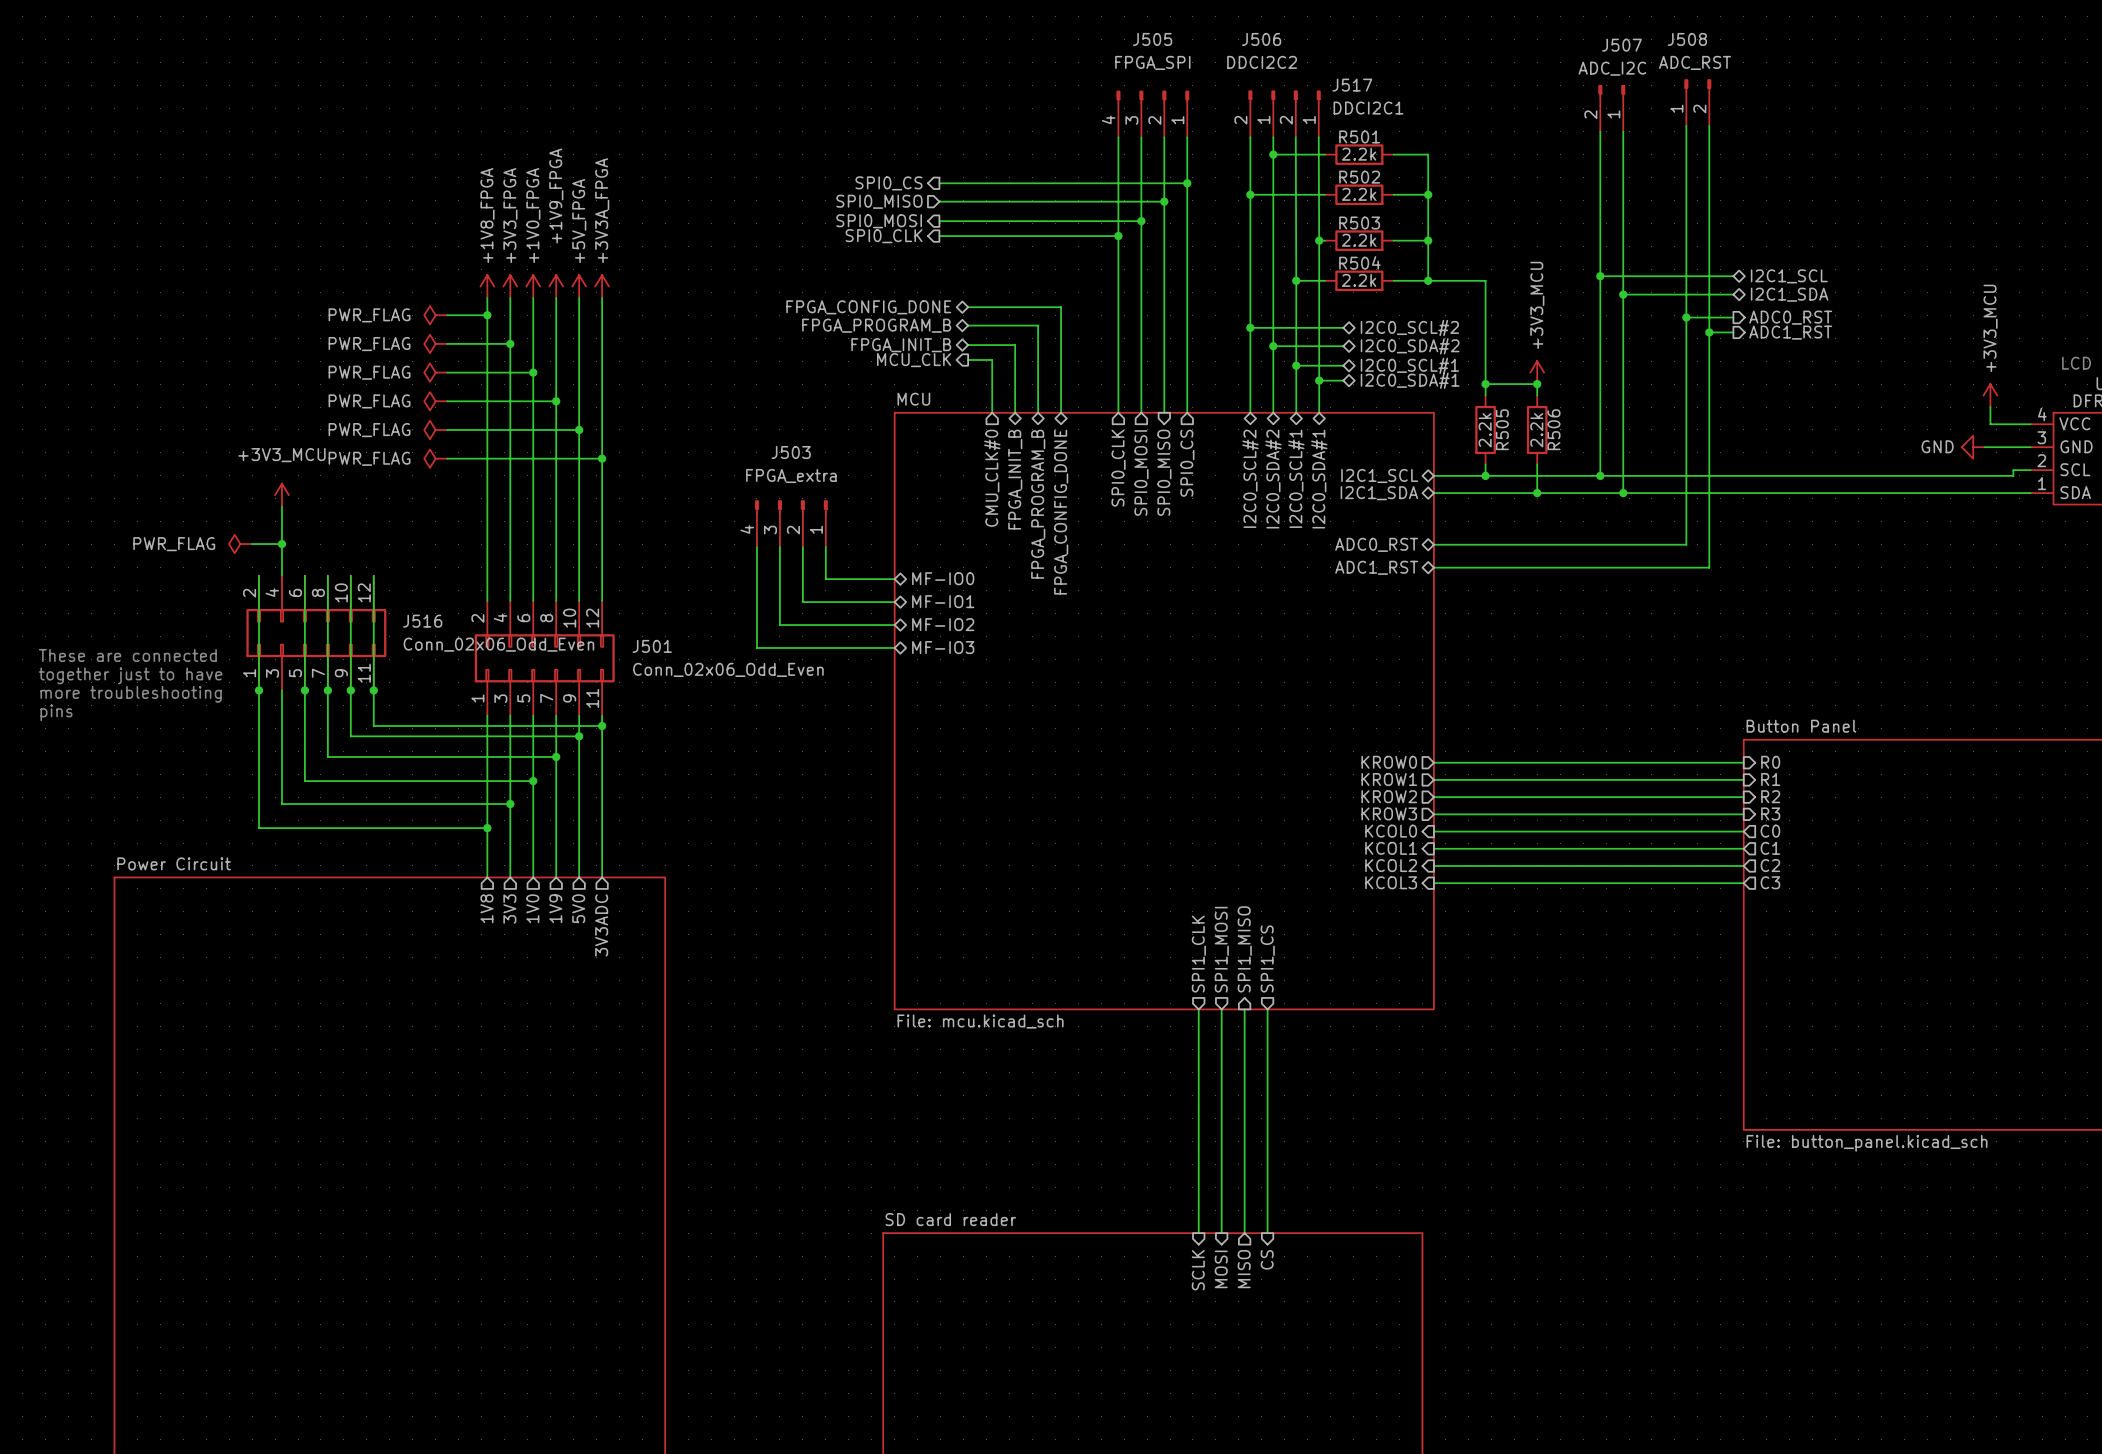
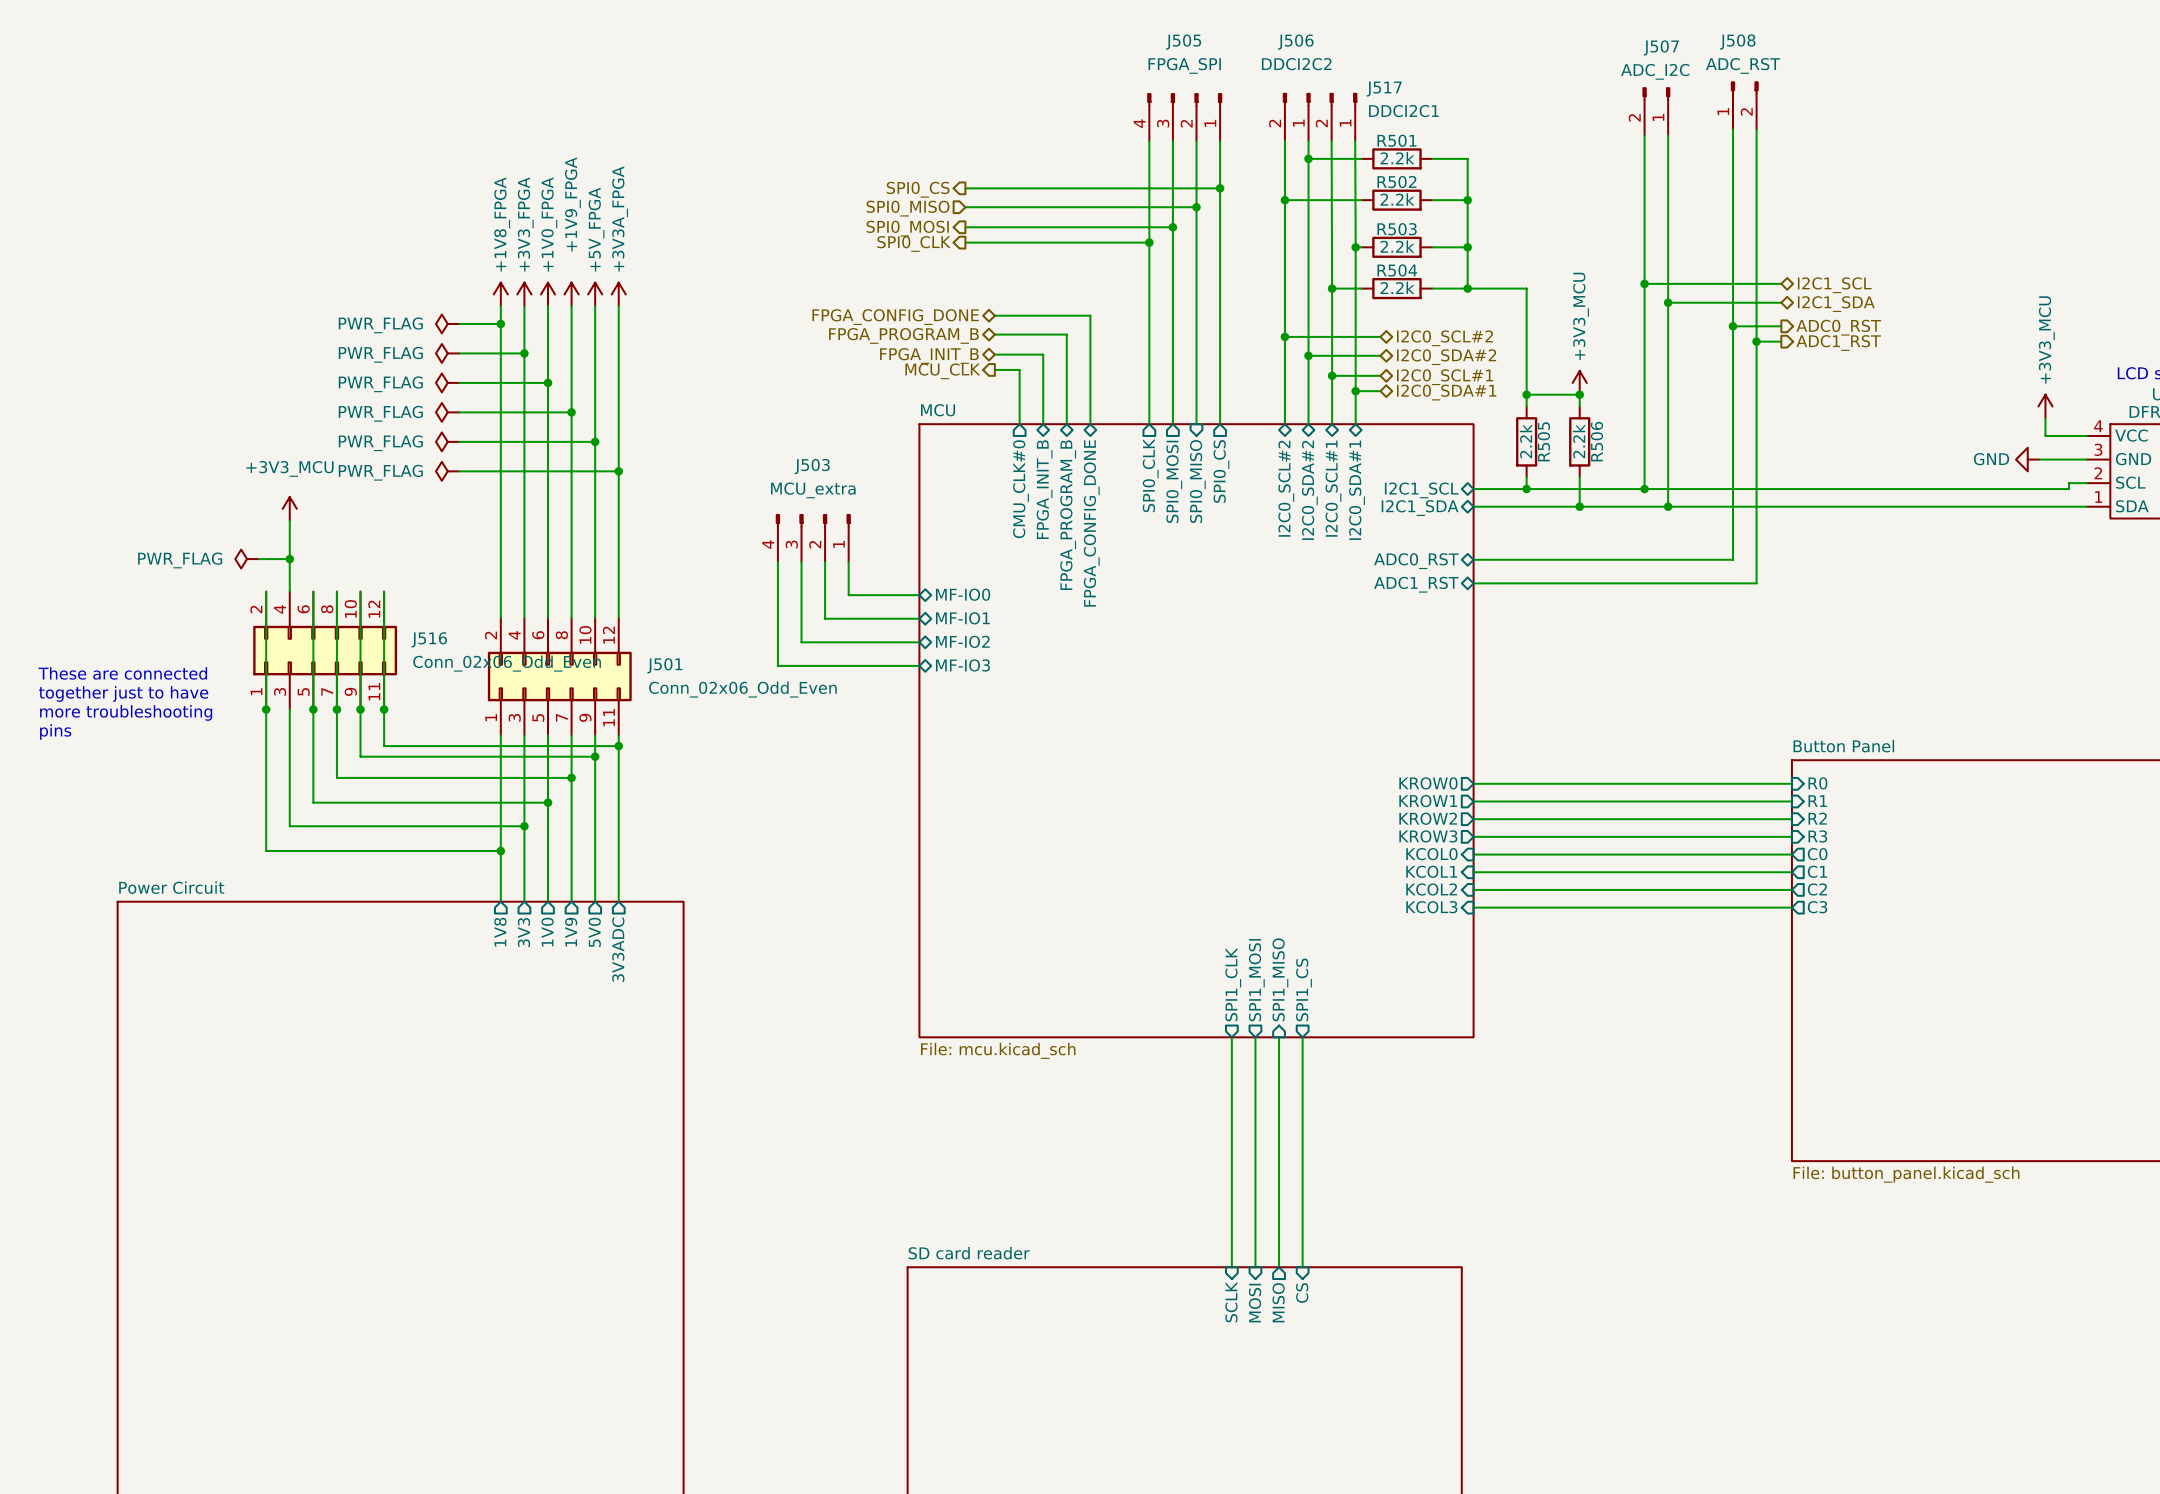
J503 value: FPGA_extra (791, 475) -> MCU_extra (813, 490)

